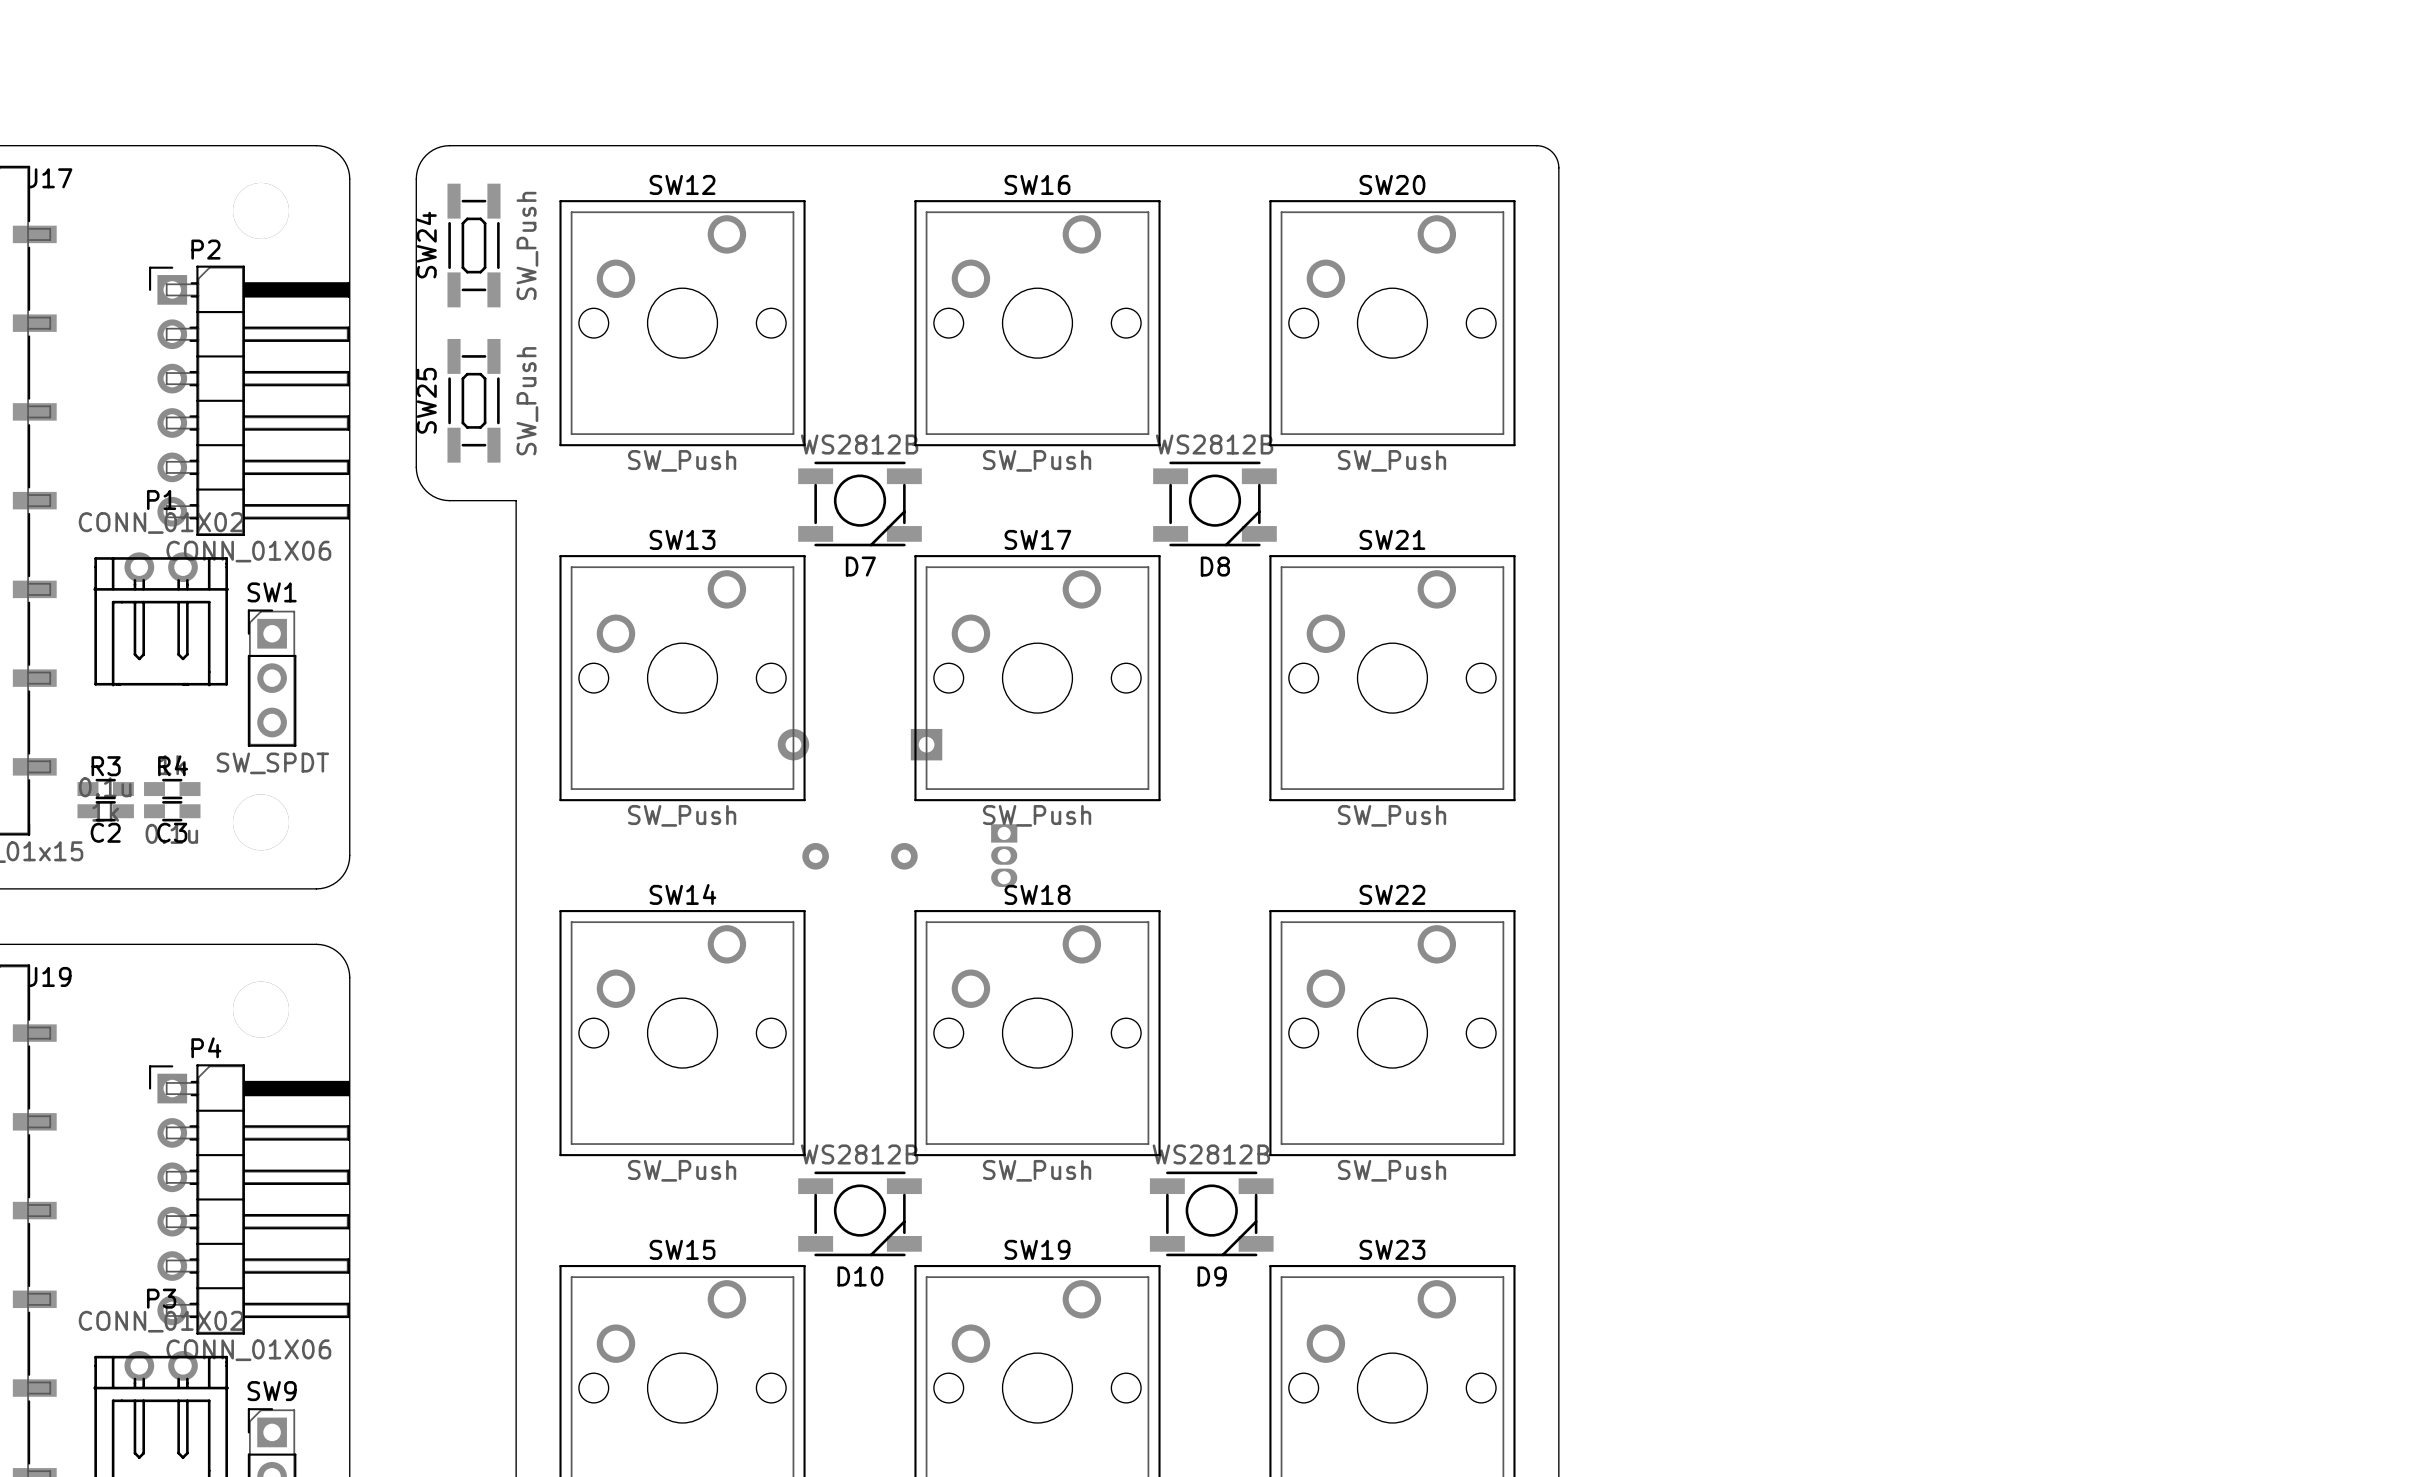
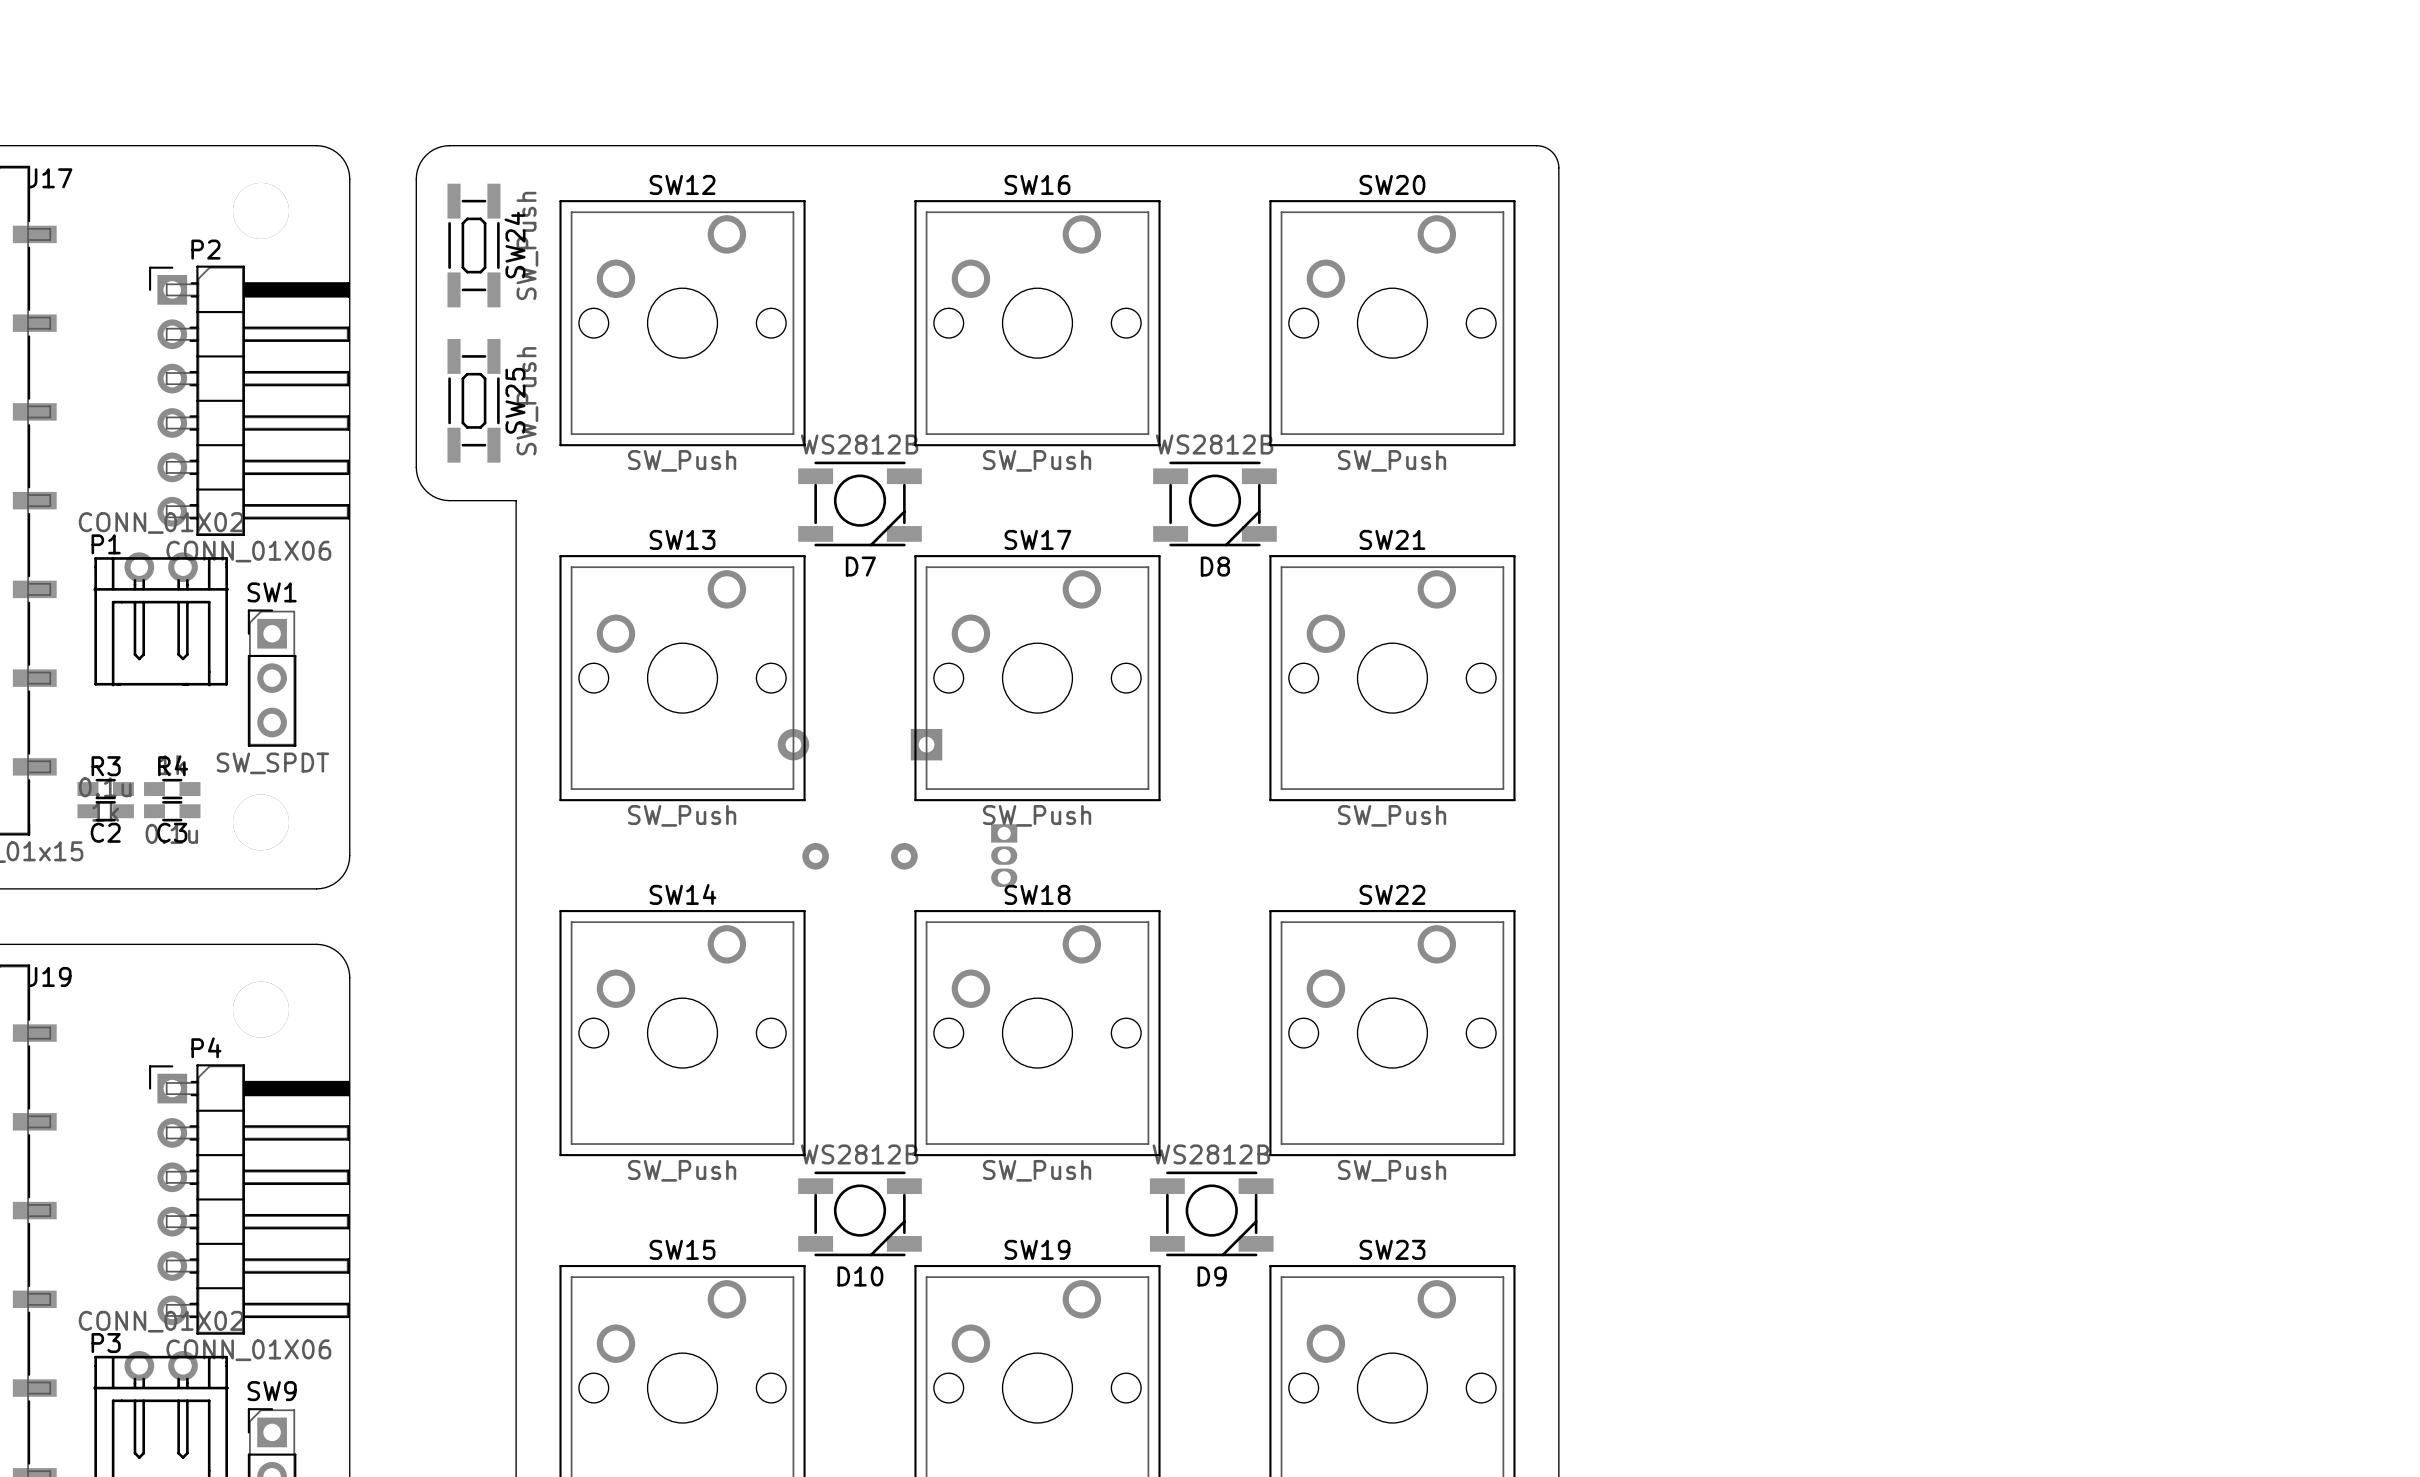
SW24 name position: SW24 (426, 245) -> SW24 (515, 245)
SW25 name position: SW25 (426, 400) -> SW25 (515, 400)
P1 name position: P1 (161, 499) -> P1 (106, 544)
P3 name position: P3 (161, 1298) -> P3 (106, 1343)

